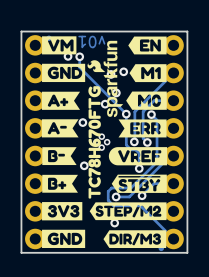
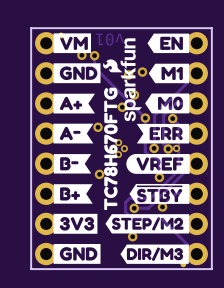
via: none -> (176, 148)

